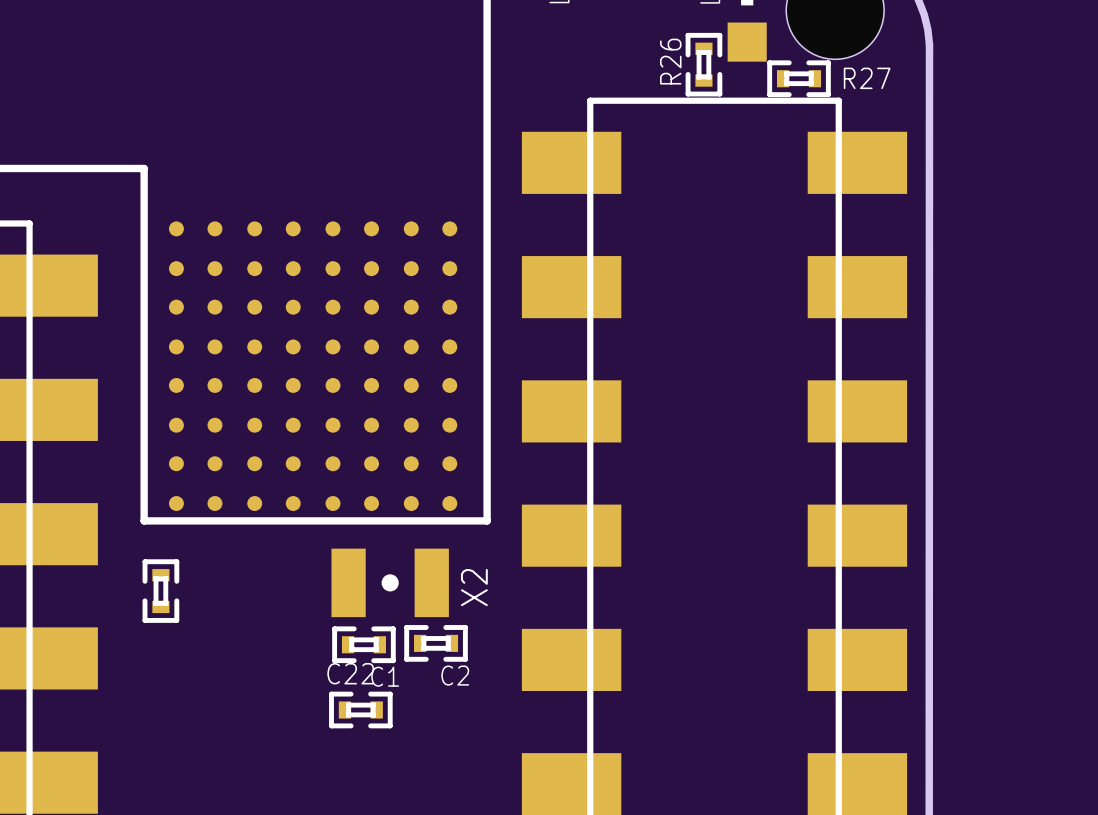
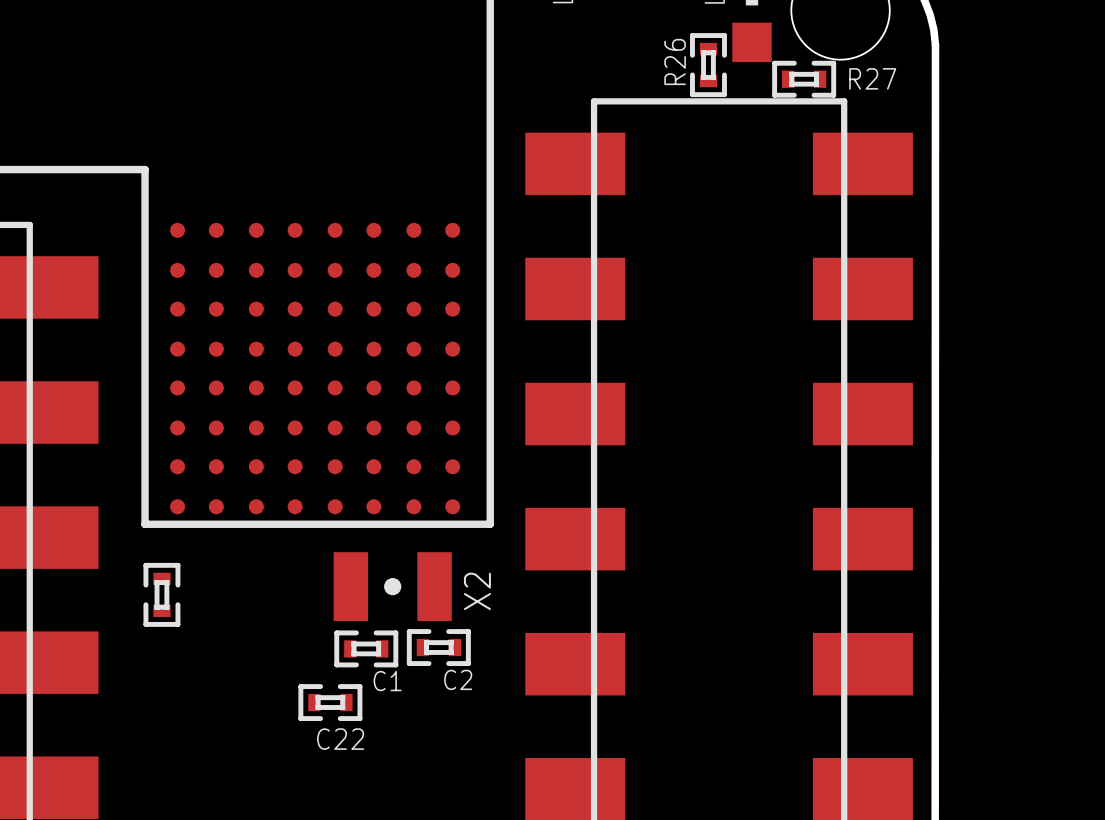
C22 name position: C22 (350, 673) -> C22 (340, 739)
C22 position: (360, 710) -> (330, 702)

